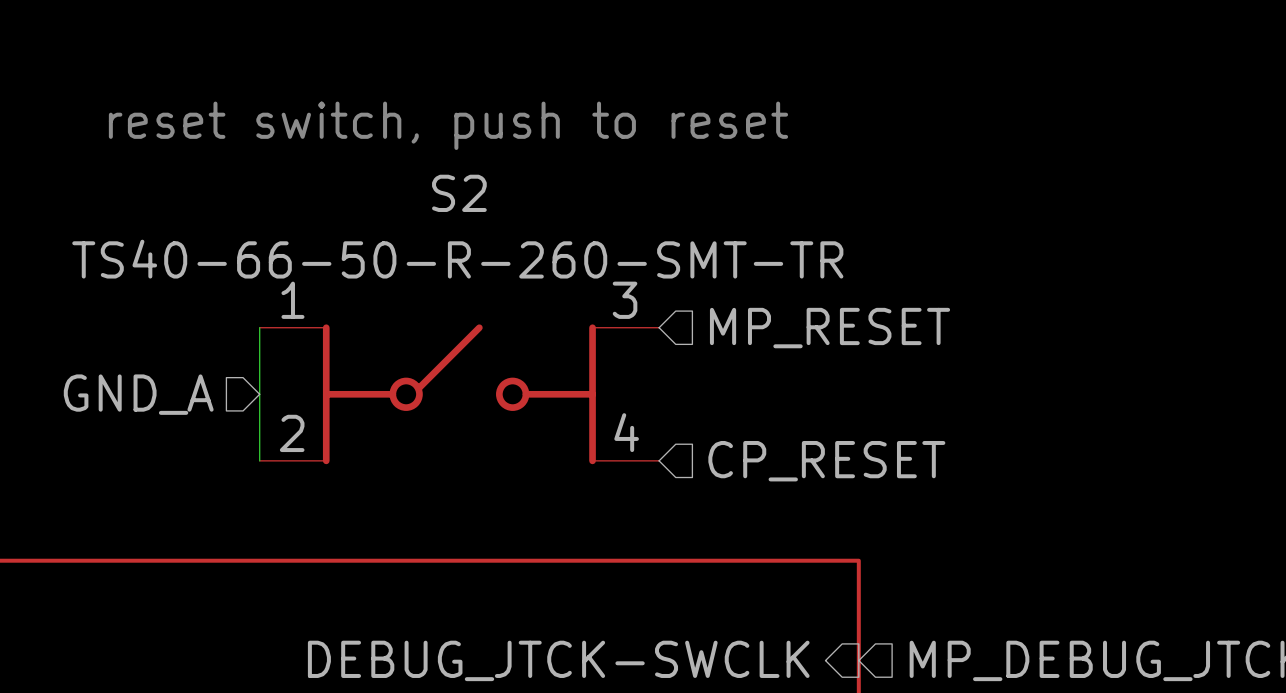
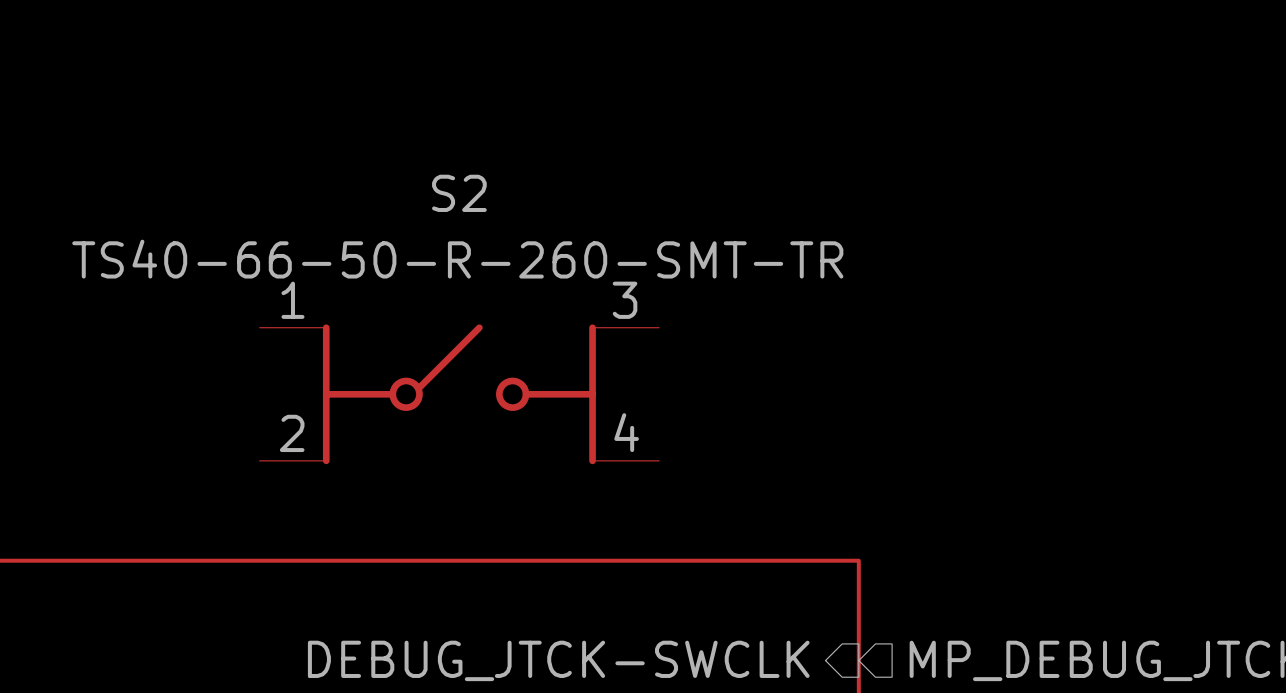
text: reset switch, push to reset (448, 125) -> none
wire: (259, 327) (259, 460) -> none
hierarchical label: MP_RESET (830, 328) -> none
hierarchical label: GND_A (138, 394) -> none
hierarchical label: CP_RESET (826, 461) -> none

